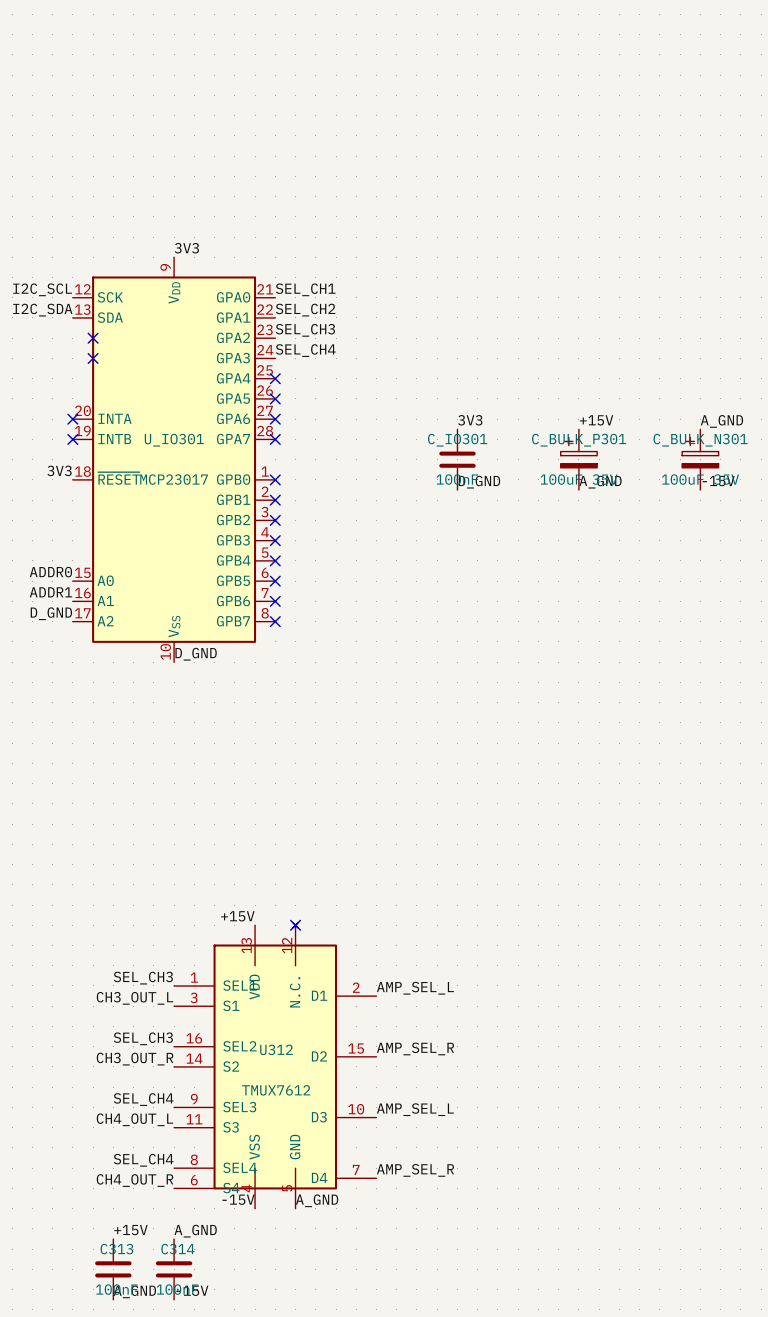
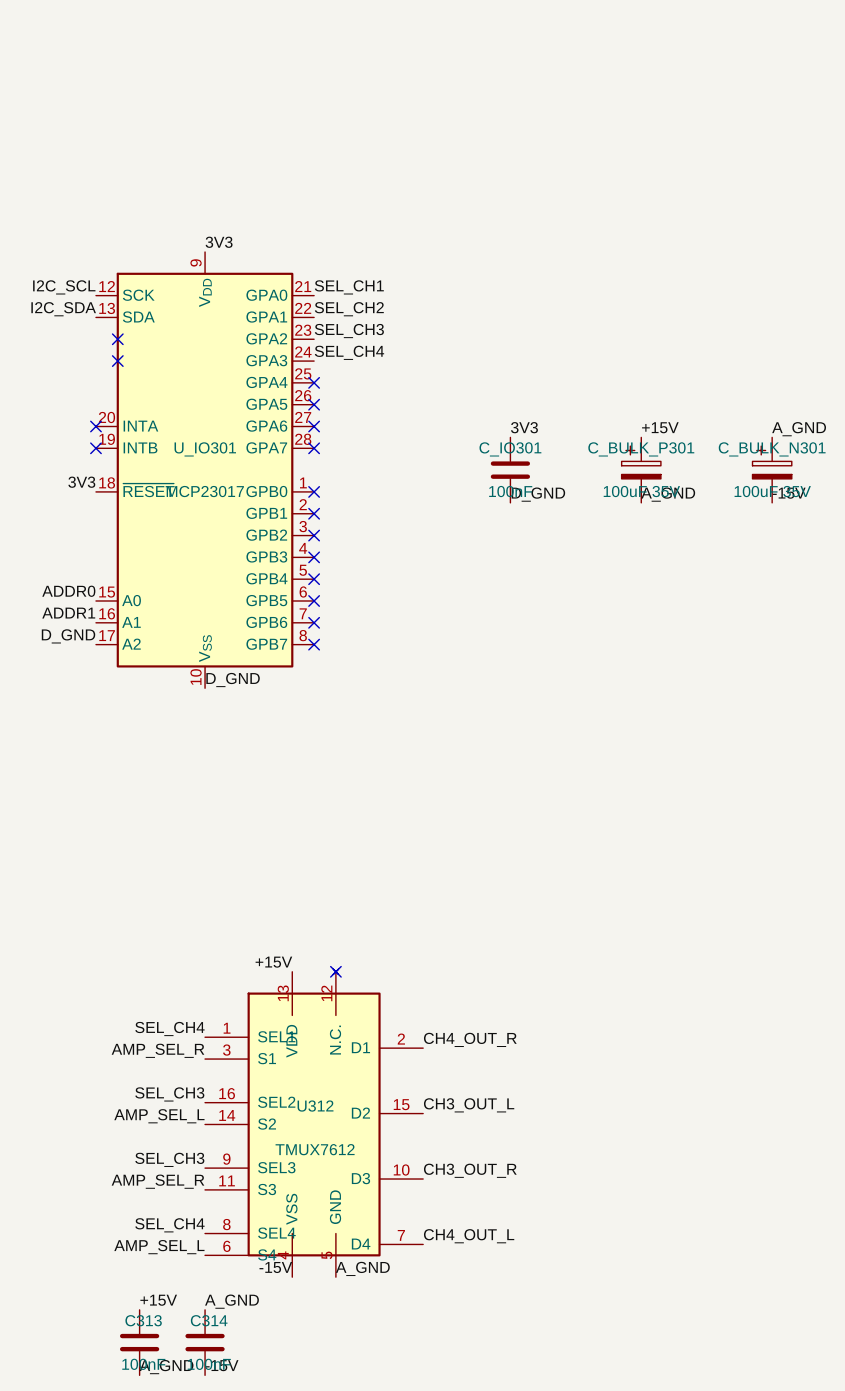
label: SEL_CH3 (143, 978) -> SEL_CH4 (169, 1028)
label: AMP_SEL_L (415, 988) -> CH4_OUT_R (470, 1039)
label: CH3_OUT_L (134, 998) -> AMP_SEL_R (157, 1050)
label: AMP_SEL_R (415, 1048) -> CH3_OUT_L (469, 1105)
label: CH3_OUT_R (135, 1059) -> AMP_SEL_L (159, 1116)
label: SEL_CH4 (143, 1099) -> SEL_CH3 (169, 1159)
label: AMP_SEL_L (415, 1109) -> CH3_OUT_R (470, 1170)
label: CH4_OUT_L (134, 1119) -> AMP_SEL_R (157, 1181)
label: AMP_SEL_R (415, 1170) -> CH4_OUT_L (469, 1236)
label: CH4_OUT_R (135, 1180) -> AMP_SEL_L (159, 1247)

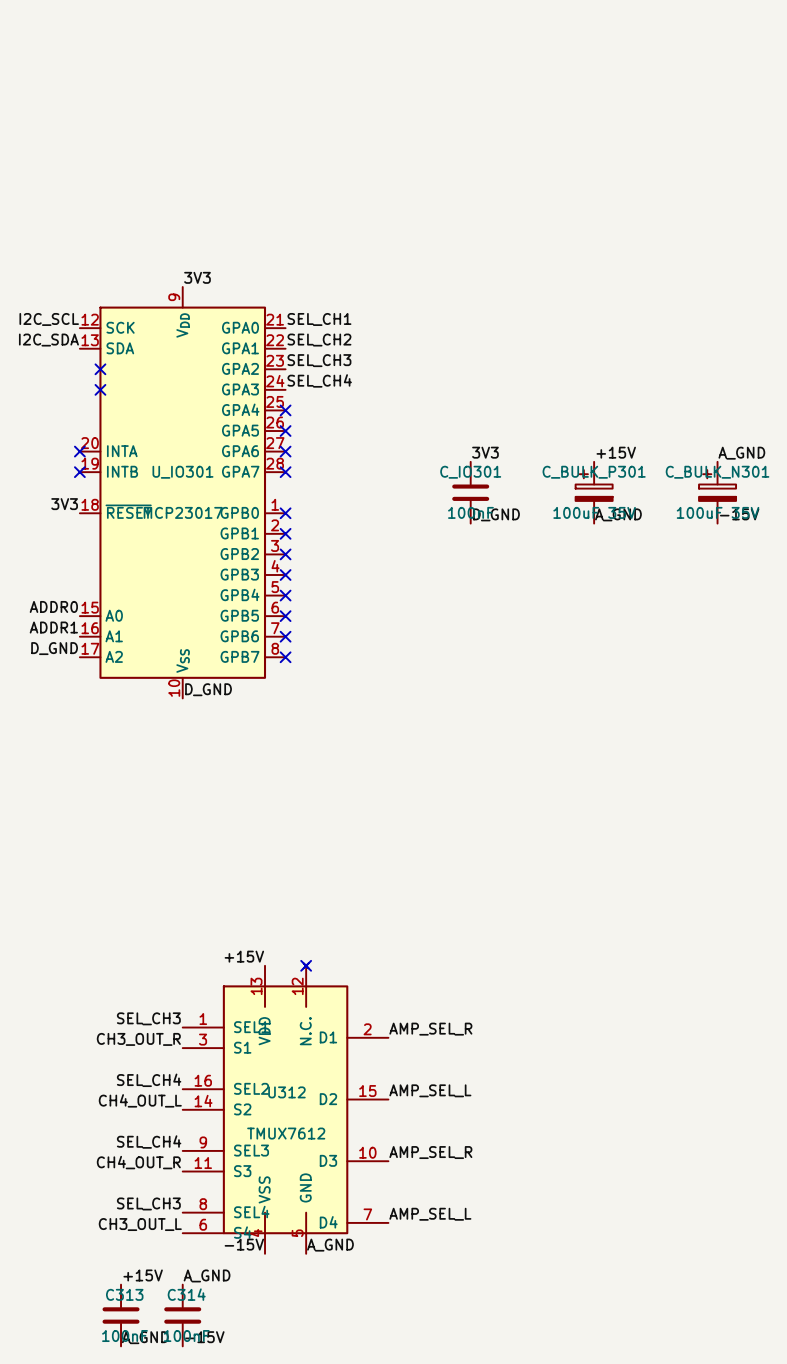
label: SEL_CH4 (169, 1028) -> SEL_CH3 (148, 1018)
label: CH4_OUT_R (470, 1039) -> AMP_SEL_R (430, 1029)
label: AMP_SEL_R (157, 1050) -> CH3_OUT_R (138, 1039)
label: SEL_CH3 (169, 1094) -> SEL_CH4 (149, 1080)
label: CH3_OUT_L (469, 1105) -> AMP_SEL_L (430, 1090)
label: AMP_SEL_L (159, 1116) -> CH4_OUT_L (140, 1100)
label: SEL_CH3 (169, 1159) -> SEL_CH4 (149, 1142)
label: CH3_OUT_R (470, 1170) -> AMP_SEL_R (430, 1152)
label: AMP_SEL_R (157, 1181) -> CH4_OUT_R (138, 1162)
label: SEL_CH4 (169, 1225) -> SEL_CH3 (148, 1203)
label: CH4_OUT_L (469, 1236) -> AMP_SEL_L (430, 1214)
label: AMP_SEL_L (159, 1247) -> CH3_OUT_L (140, 1224)

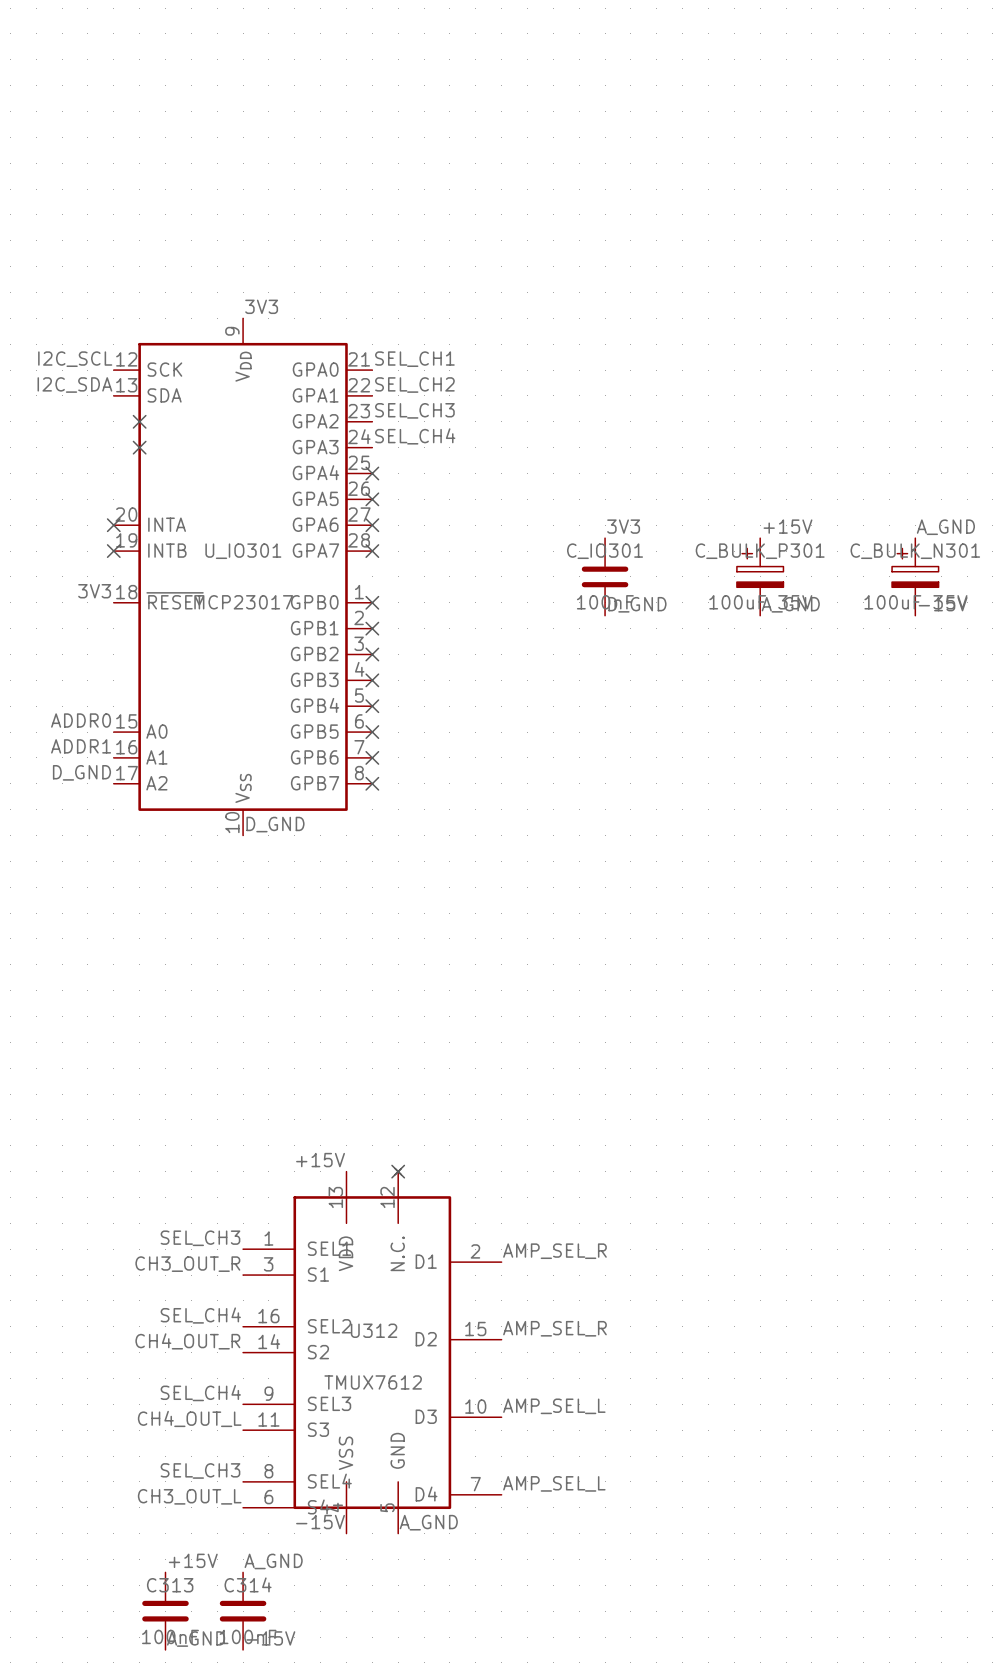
label: AMP_SEL_L (430, 1090) -> AMP_SEL_R (554, 1328)
label: CH4_OUT_L (140, 1100) -> CH4_OUT_R (187, 1341)
label: AMP_SEL_R (430, 1152) -> AMP_SEL_L (554, 1406)
label: CH4_OUT_R (138, 1162) -> CH4_OUT_L (189, 1418)

